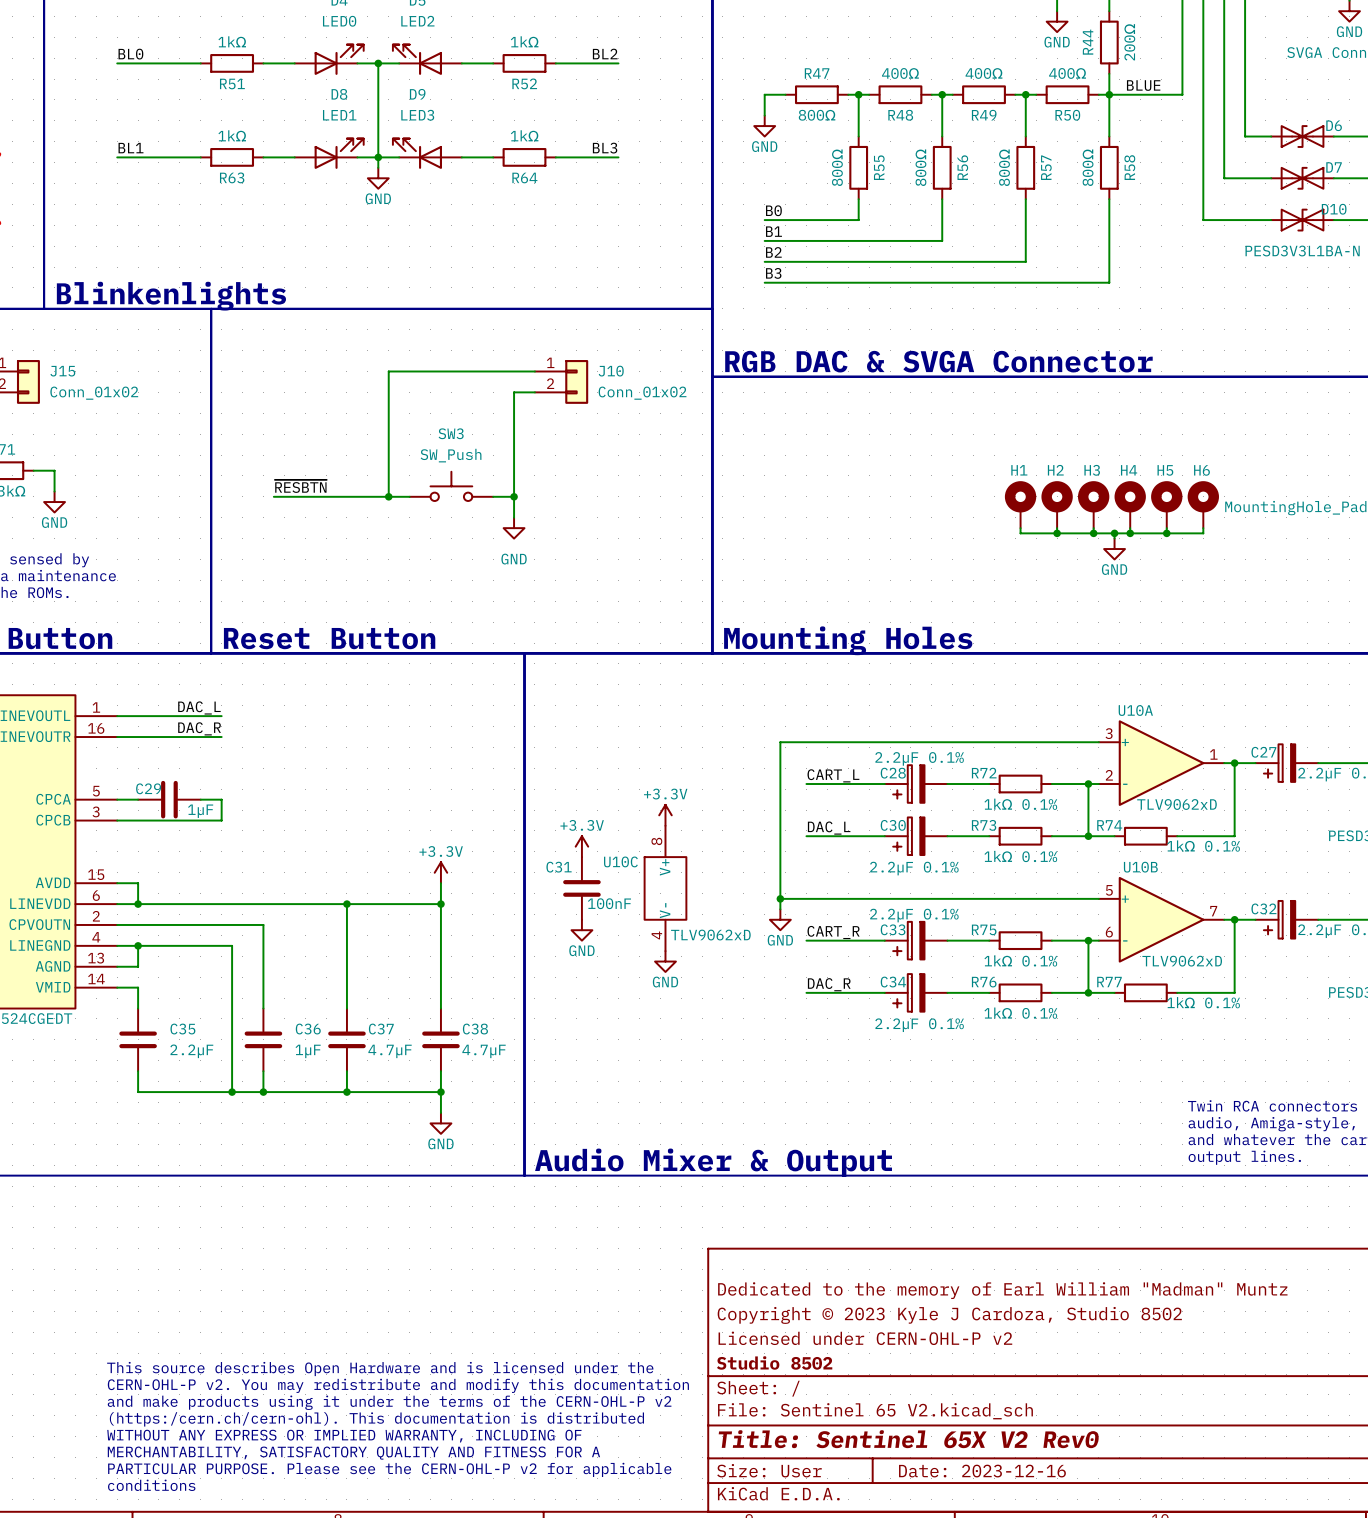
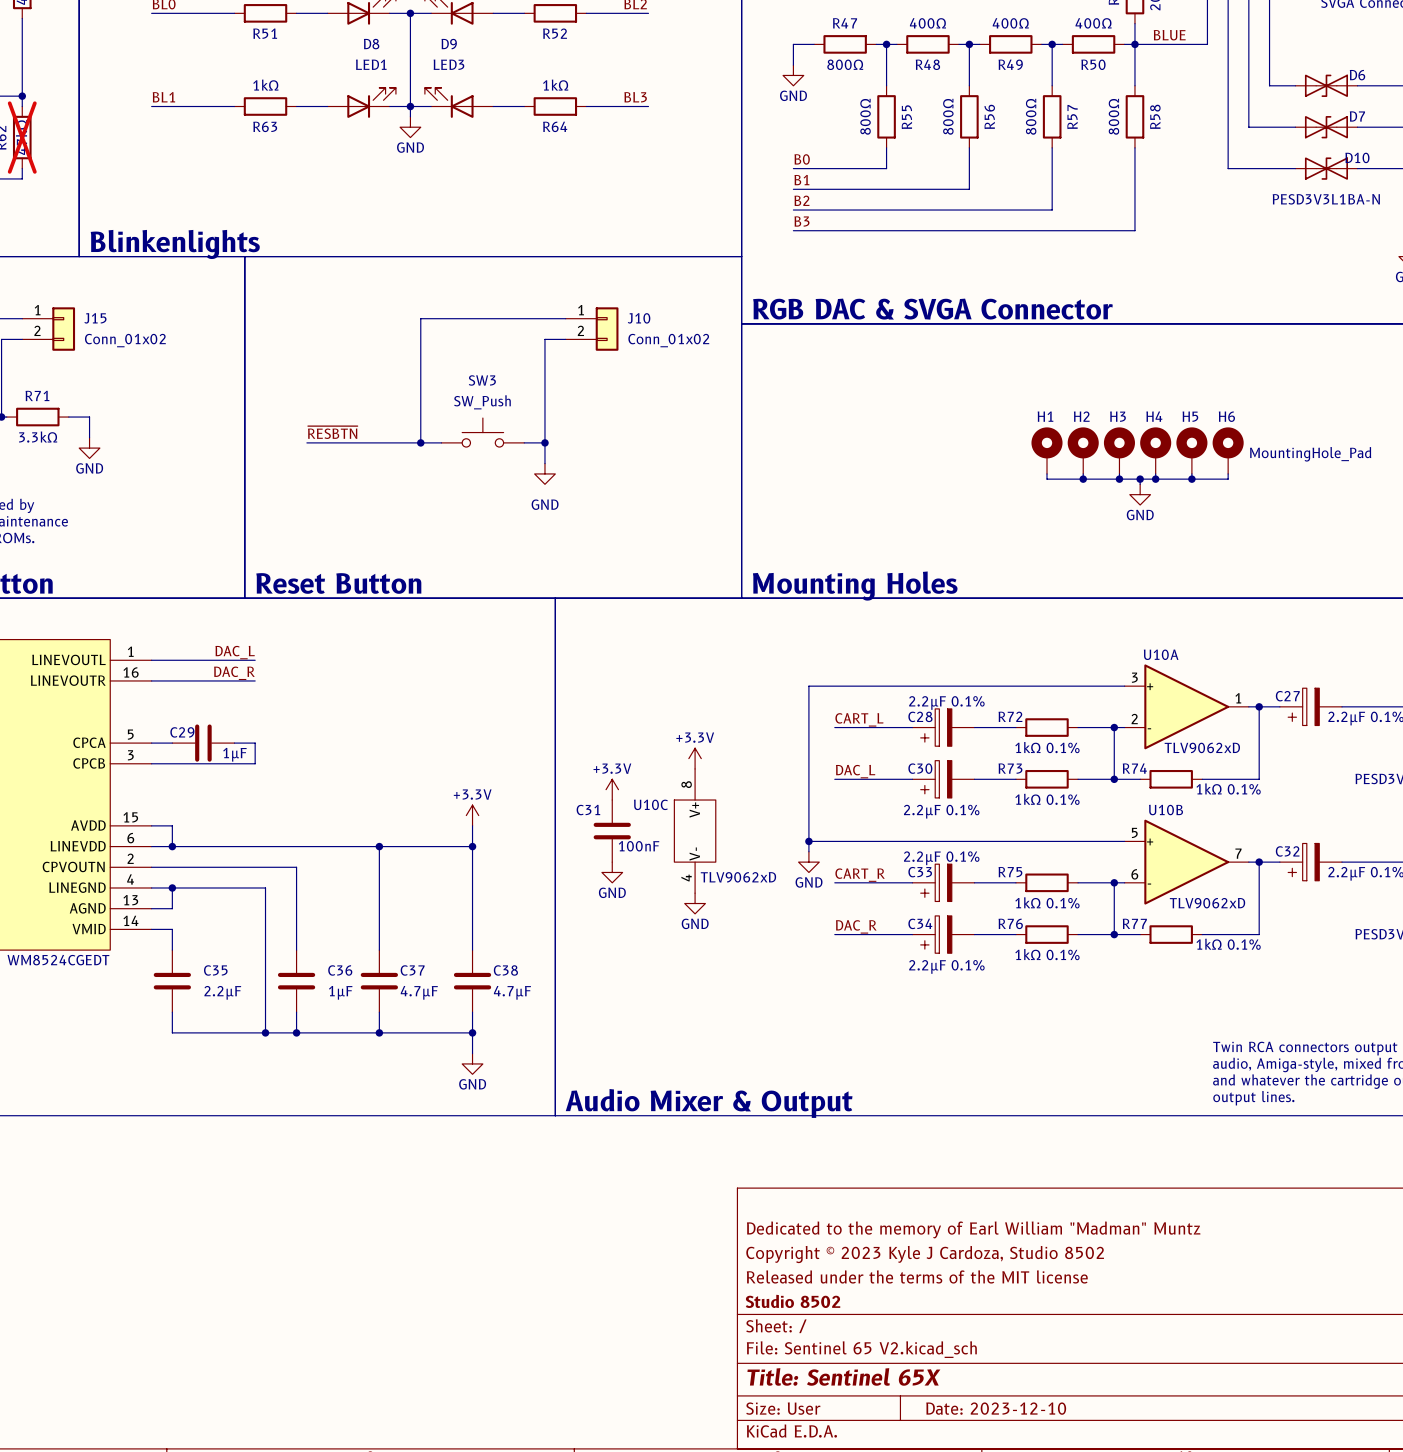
title block: Licensed under CERN-OHL-P v2 (865, 1338) -> Released under the terms of the MIT license (917, 1276)
text: This source describes Open Hardware and is licensed under the (380, 1369) -> none
text: CERN-OHL-P v2. You may redistribute and modify this documentation (398, 1385) -> none
text: and make products using it under the terms of the CERN-OHL-P v2 (389, 1402) -> none
text: (https:/cern.ch/cern-ohl). This documentation is distributed (376, 1419) -> none
text: WITHOUT ANY EXPRESS OR IMPLIED WARRANTY, INCLUDING OF (344, 1436) -> none
title block: Title: Sentinel 65X V2 Rev0 (908, 1439) -> Title: Sentinel 65X (843, 1376)
text: MERCHANTABILITY, SATISFACTORY QUALITY AND FITNESS FOR A (353, 1453) -> none
text: PARTICULAR PURPOSE. Please see the CERN-OHL-P v2 for applicable (389, 1469) -> none
title block: Date: 2023-12-16 (982, 1471) -> Date: 2023-12-10 (996, 1408)
text: conditions (151, 1485) -> none

